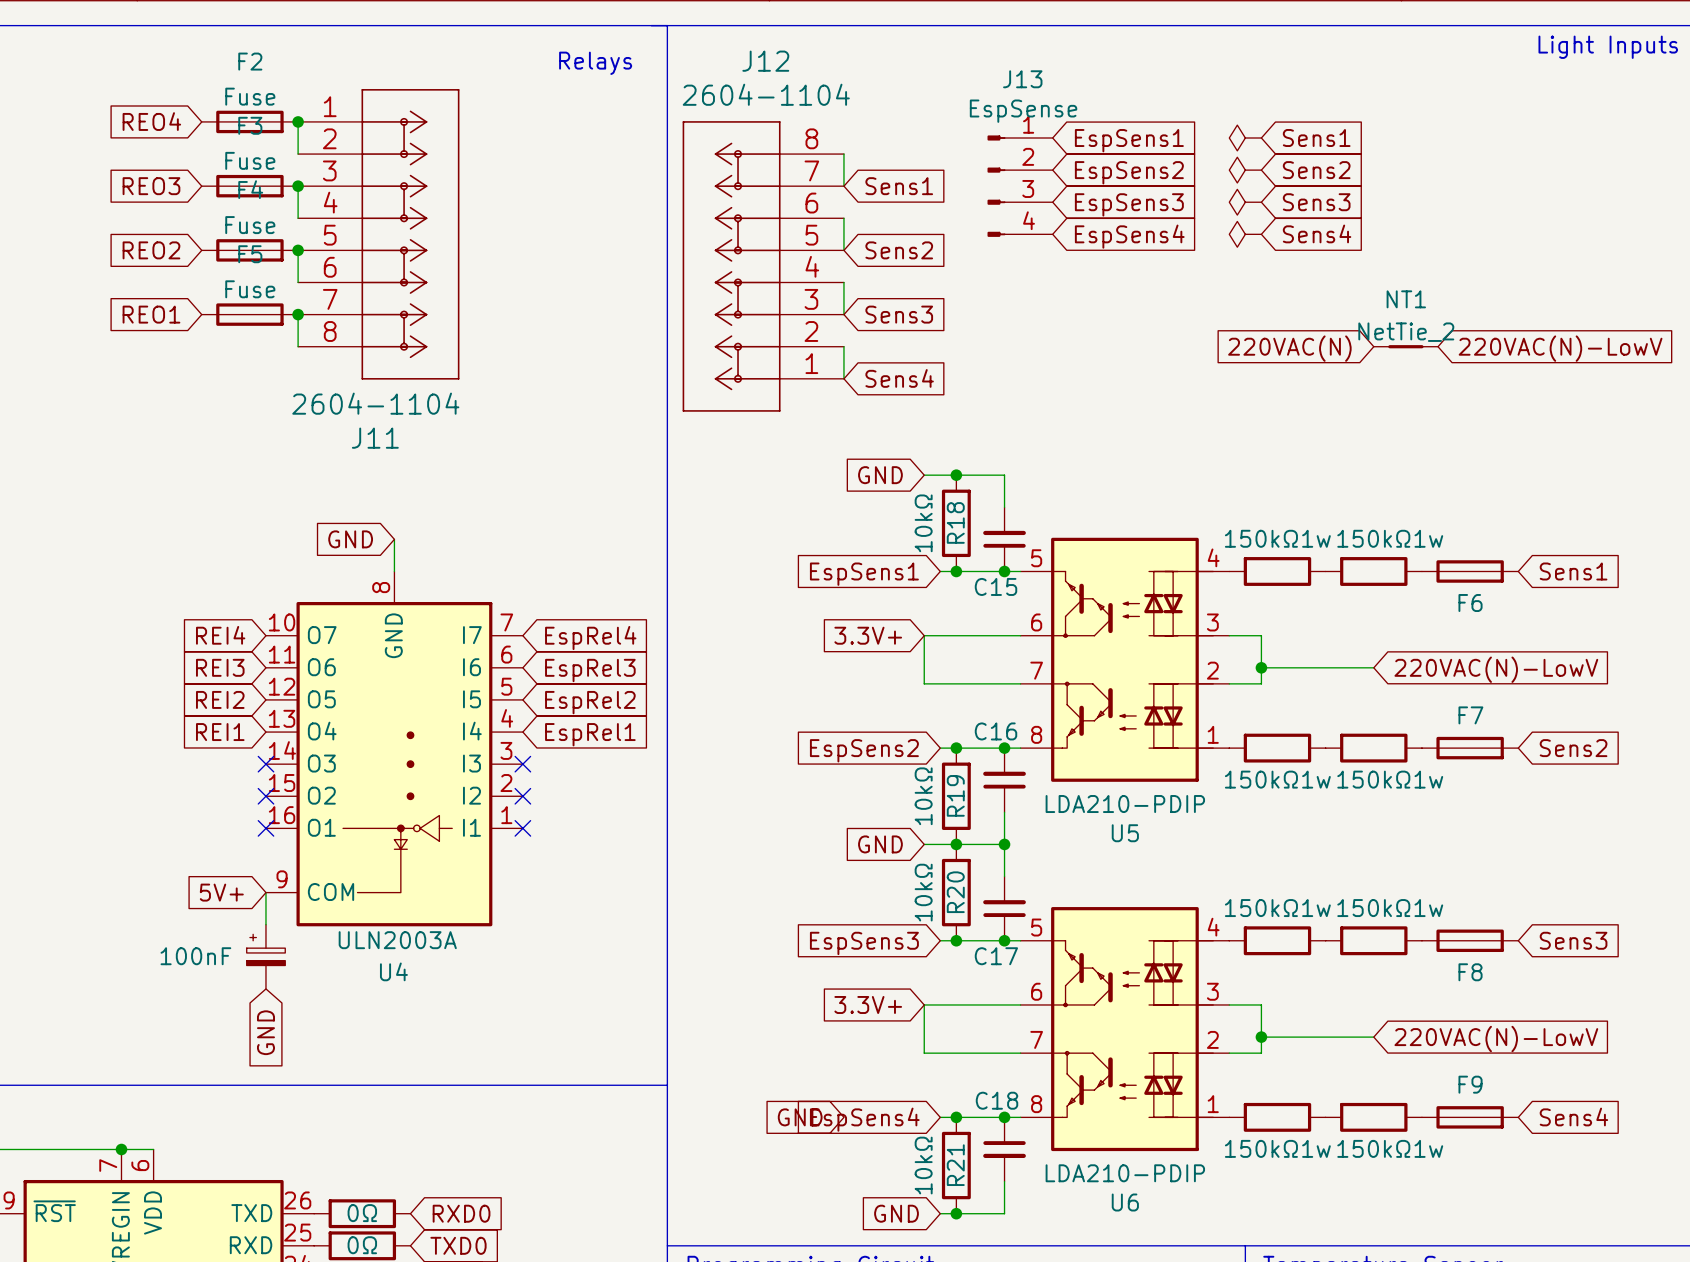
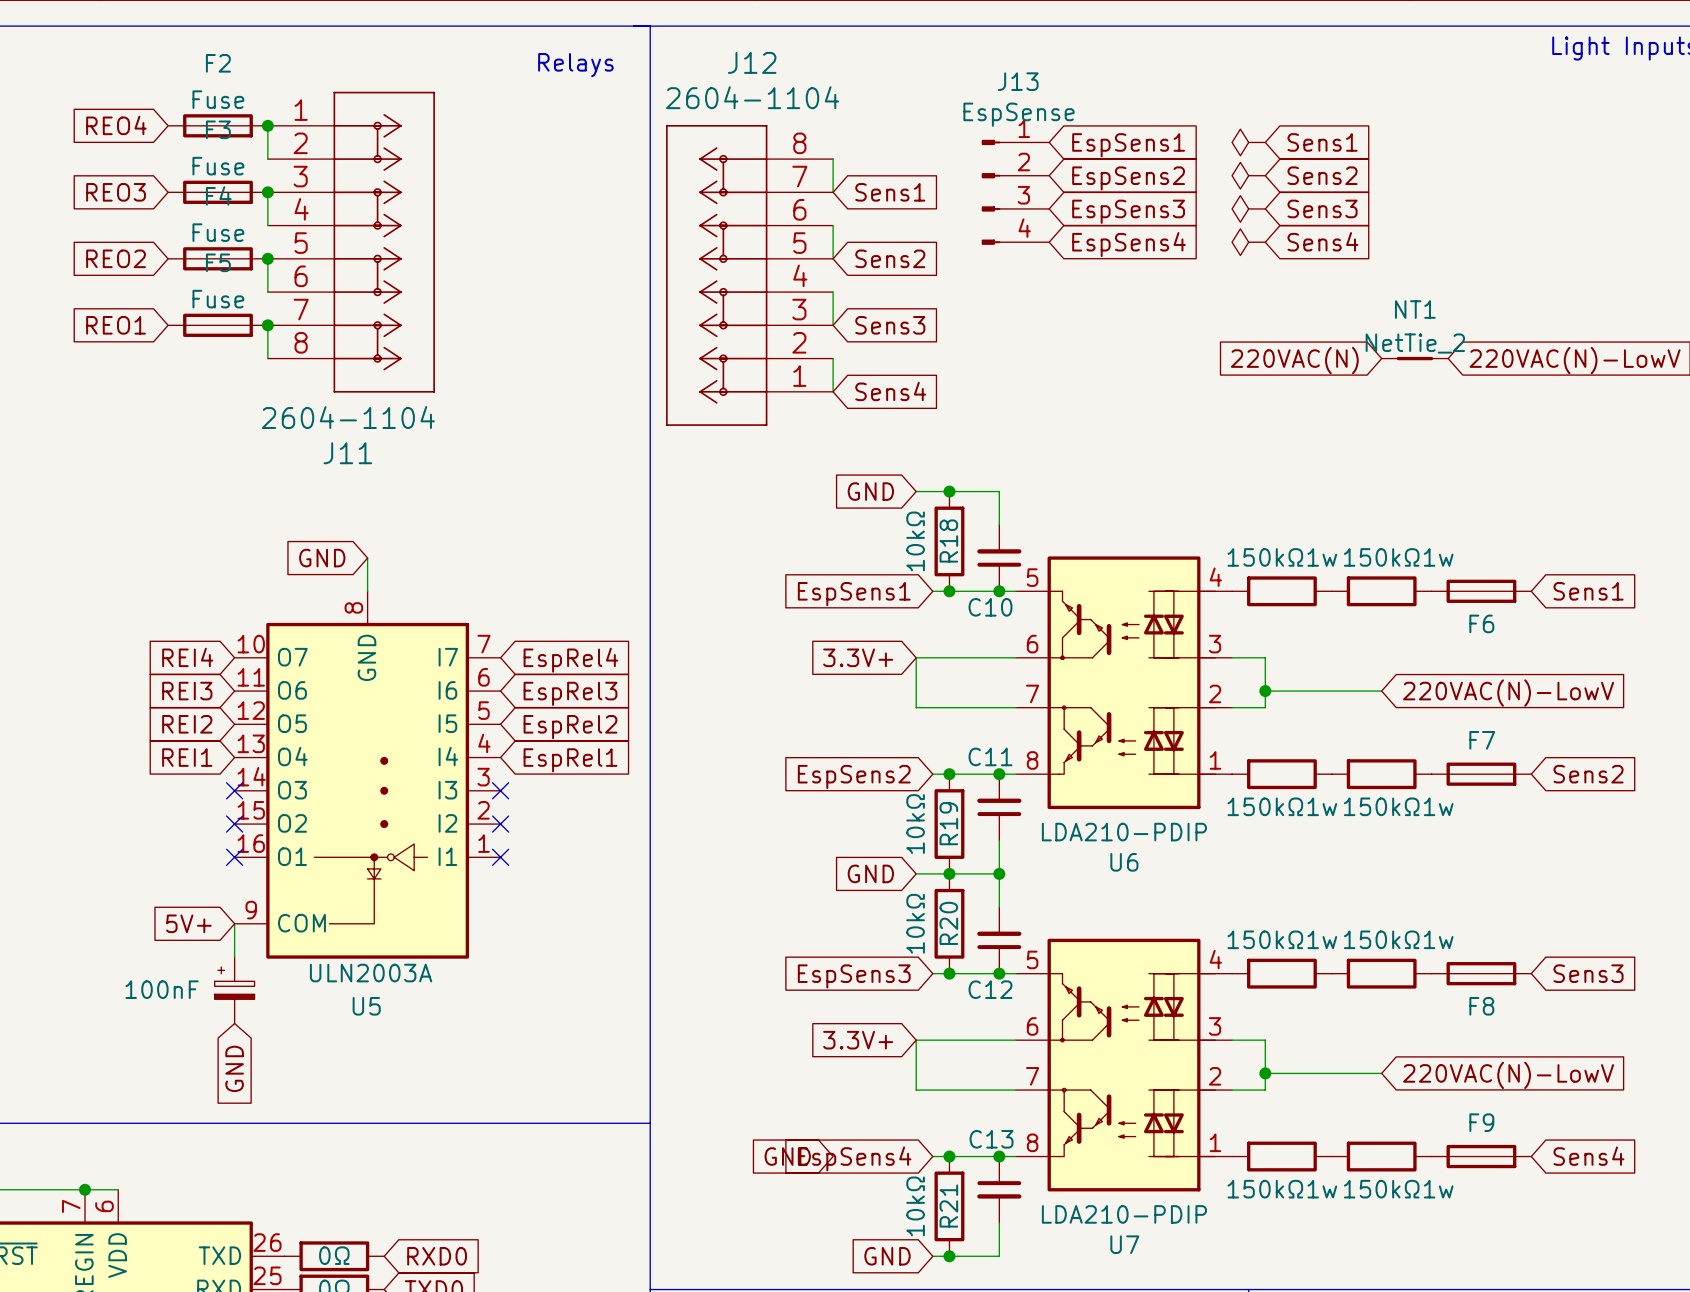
C15 name: C15 (996, 586) -> C10 (990, 607)
C16 name: C16 (996, 731) -> C11 (990, 756)
U5 name: U5 (1125, 833) -> U6 (1124, 862)
C17 name: C17 (996, 956) -> C12 (990, 989)
U4 name: U4 (393, 971) -> U5 (366, 1006)
C18 name: C18 (997, 1100) -> C13 (991, 1139)
U6 name: U6 (1125, 1202) -> U7 (1124, 1244)

